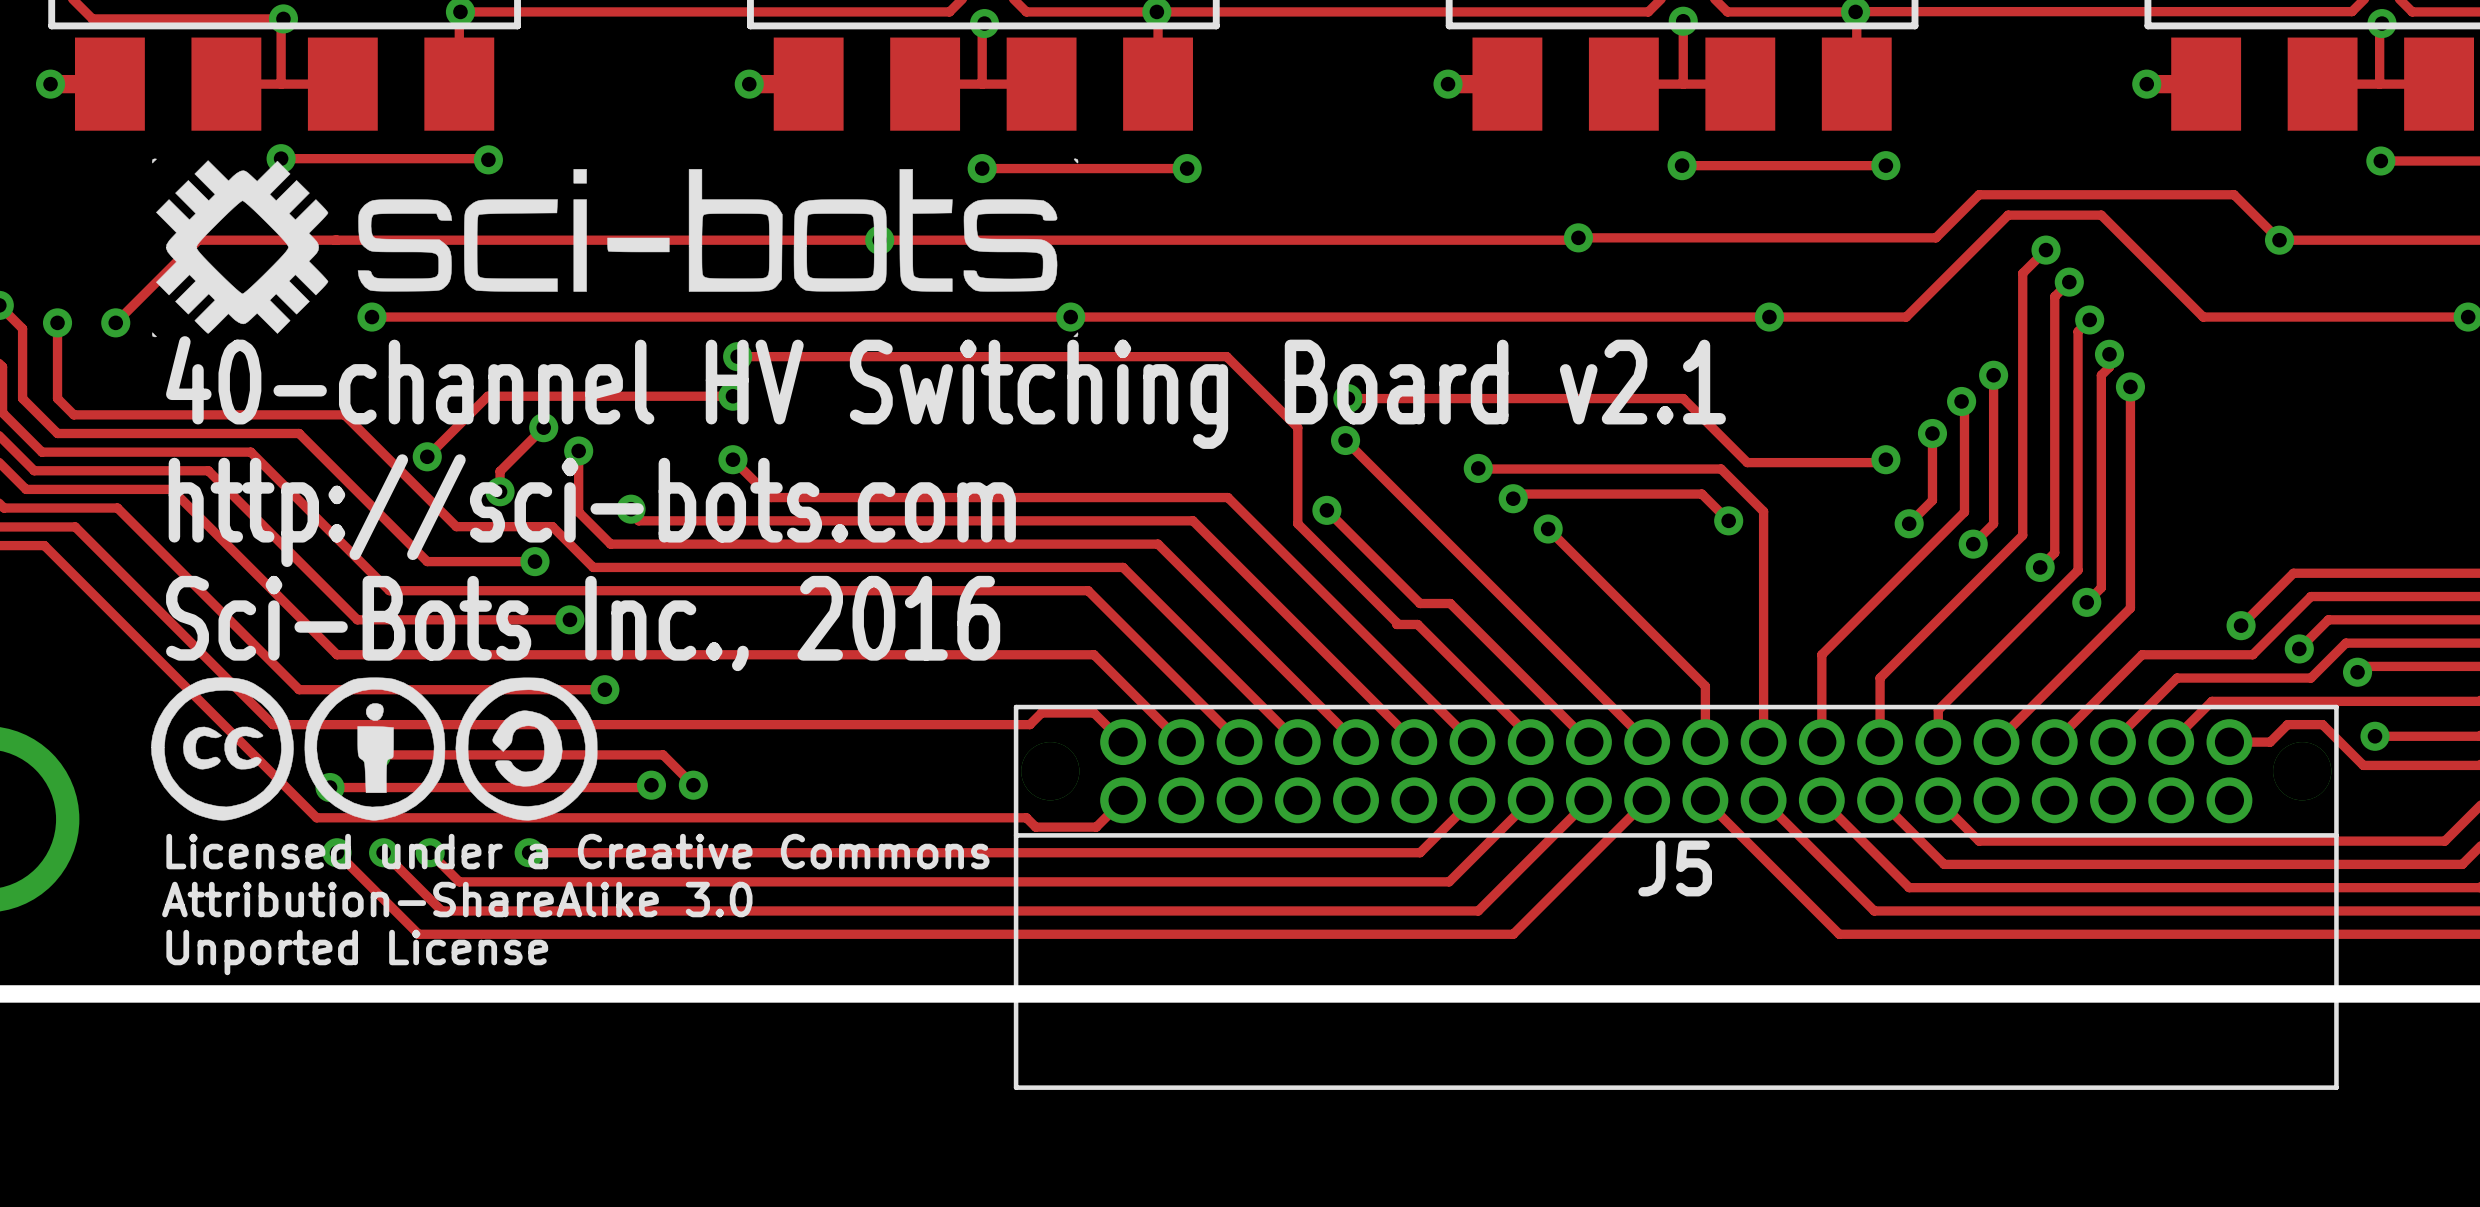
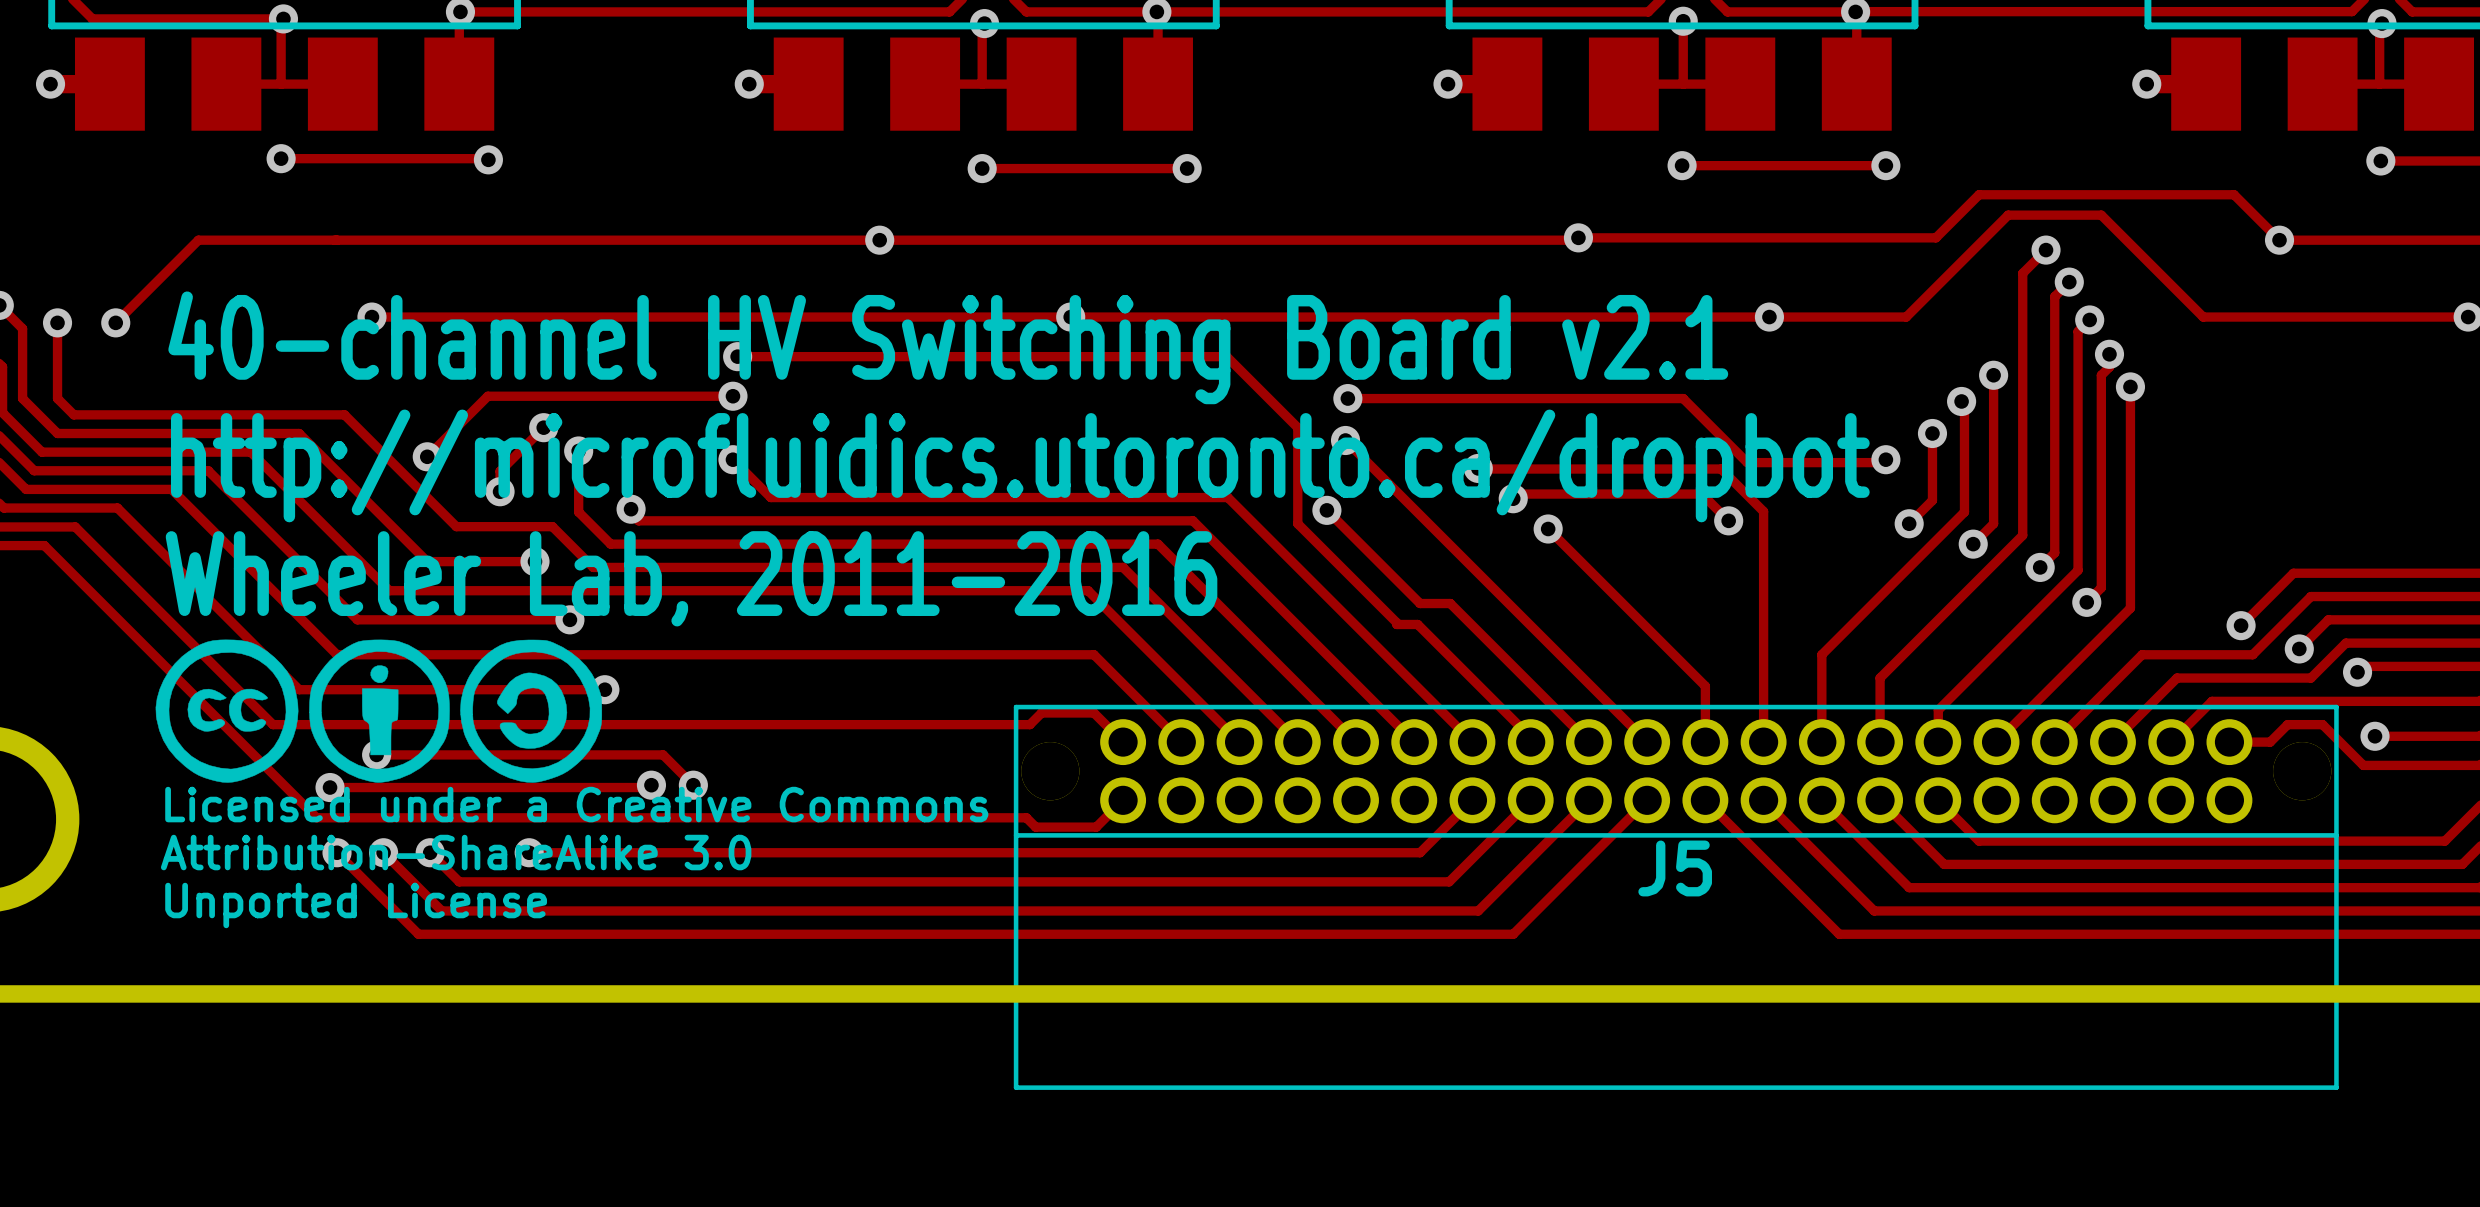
drawing: [152, 158, 1079, 338] -> none
text position: 40-channel HV Switching Board v2.1 (945, 392) -> 40-channel HV Switching Board v2.1 (948, 347)
text: none -> http://microfluidics.utoronto.ca/dropbot (1020, 465)
text: http://sci-bots.com (592, 510) -> none
text: none -> Wheeler Lab, 2011-2016 (691, 578)
text: Sci-Bots Inc., 2016 (583, 623) -> none
drawing position: (374, 749) -> (378, 711)
text: none -> Licensed under a Creative Commons (576, 804)
text: Licensed under a Creative Commons (577, 851) -> Attribution-ShareAlike 3.0 (456, 852)
text: Attribution-ShareAlike 3.0 (457, 899) -> Unported License (356, 905)
text: Unported License (357, 952) -> none

